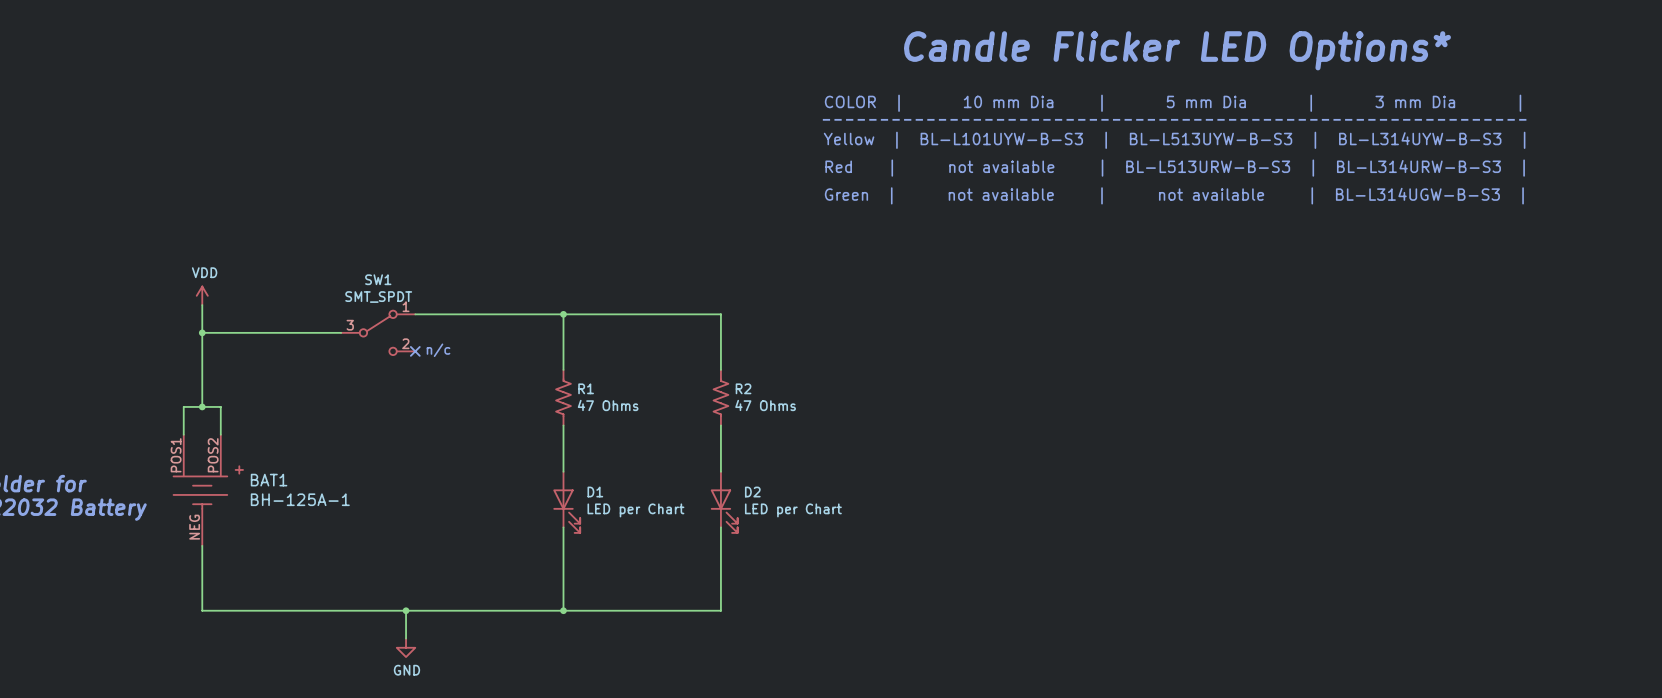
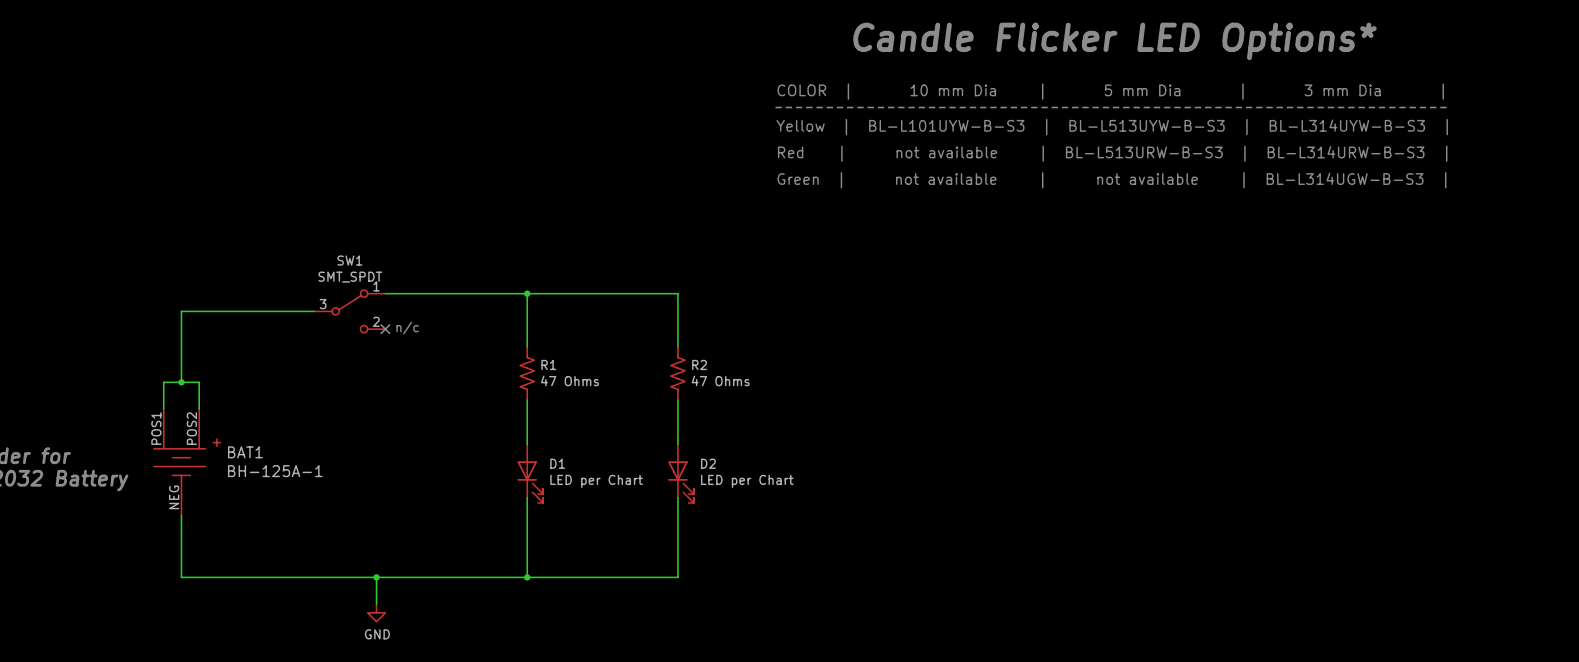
power symbol: VDD (202, 295) -> none
wire: (202, 305) (202, 332) -> none
junction: (202, 332) -> none

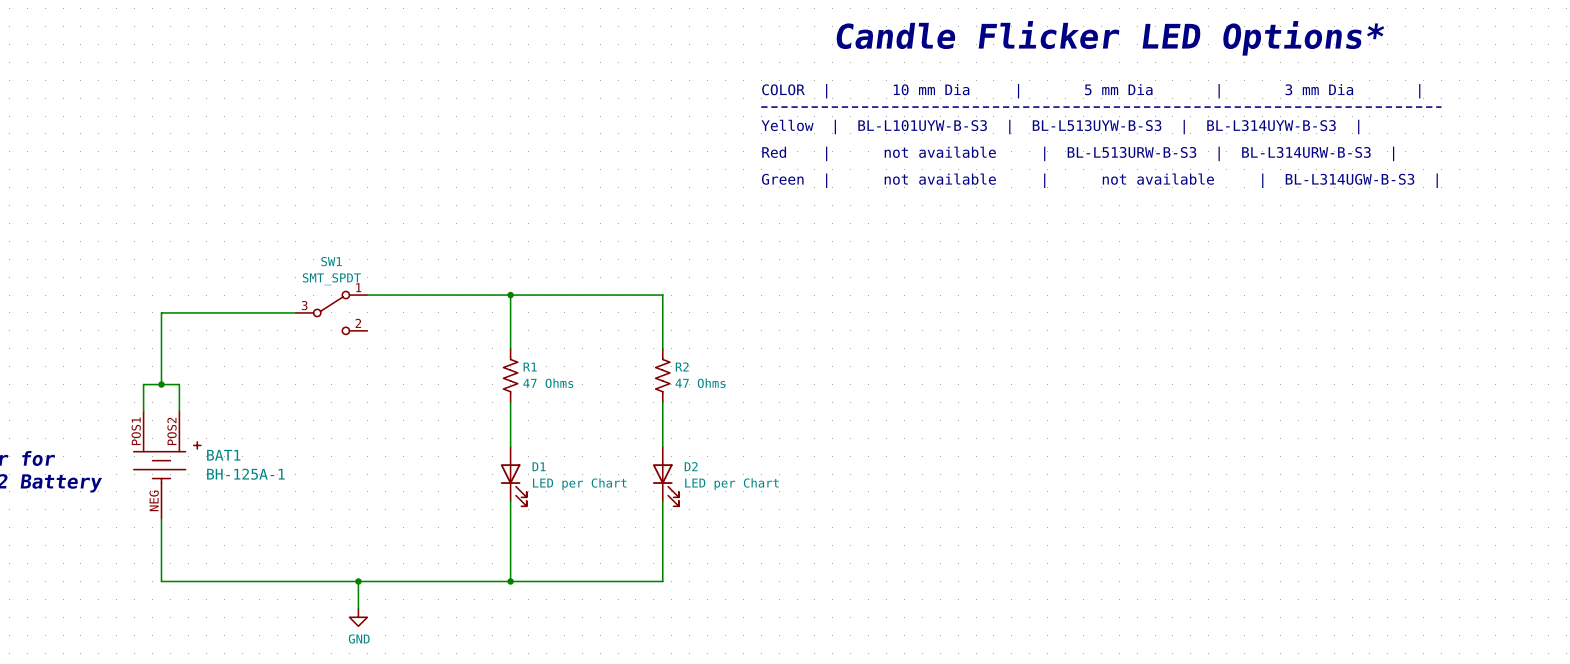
text: n/c (407, 328) -> none
no-connect mark: (385, 329) -> none

